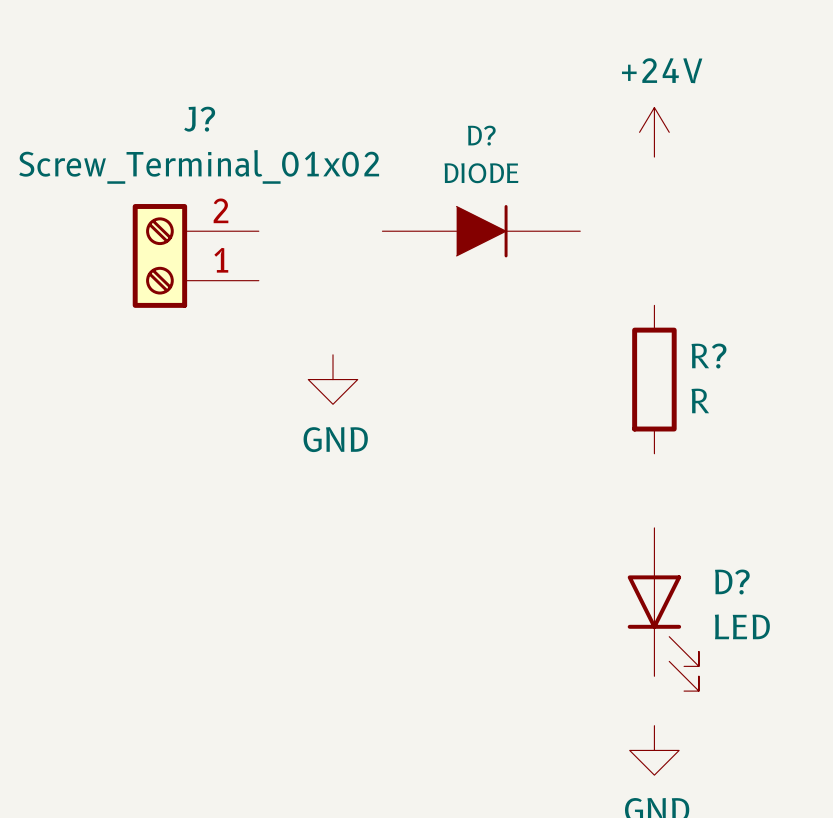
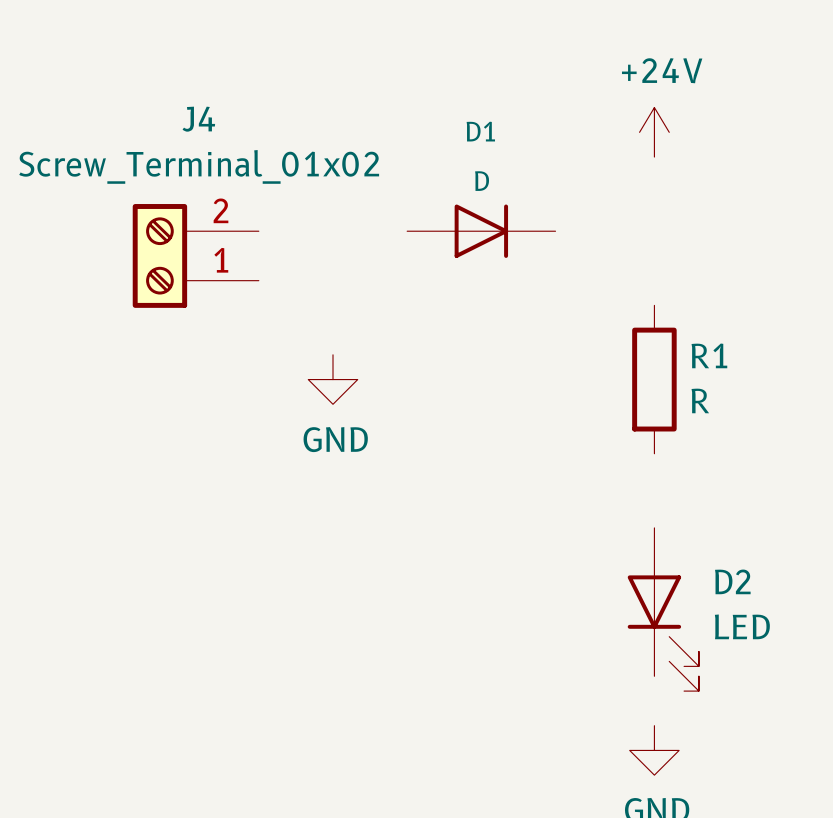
J? name: J? (199, 119) -> J4 (198, 119)
D?: DIODE (481, 231) -> none
D1: none -> D (481, 231)
R? name: R? (709, 356) -> R1 (709, 355)
D? name: D? (732, 582) -> D2 (732, 581)

